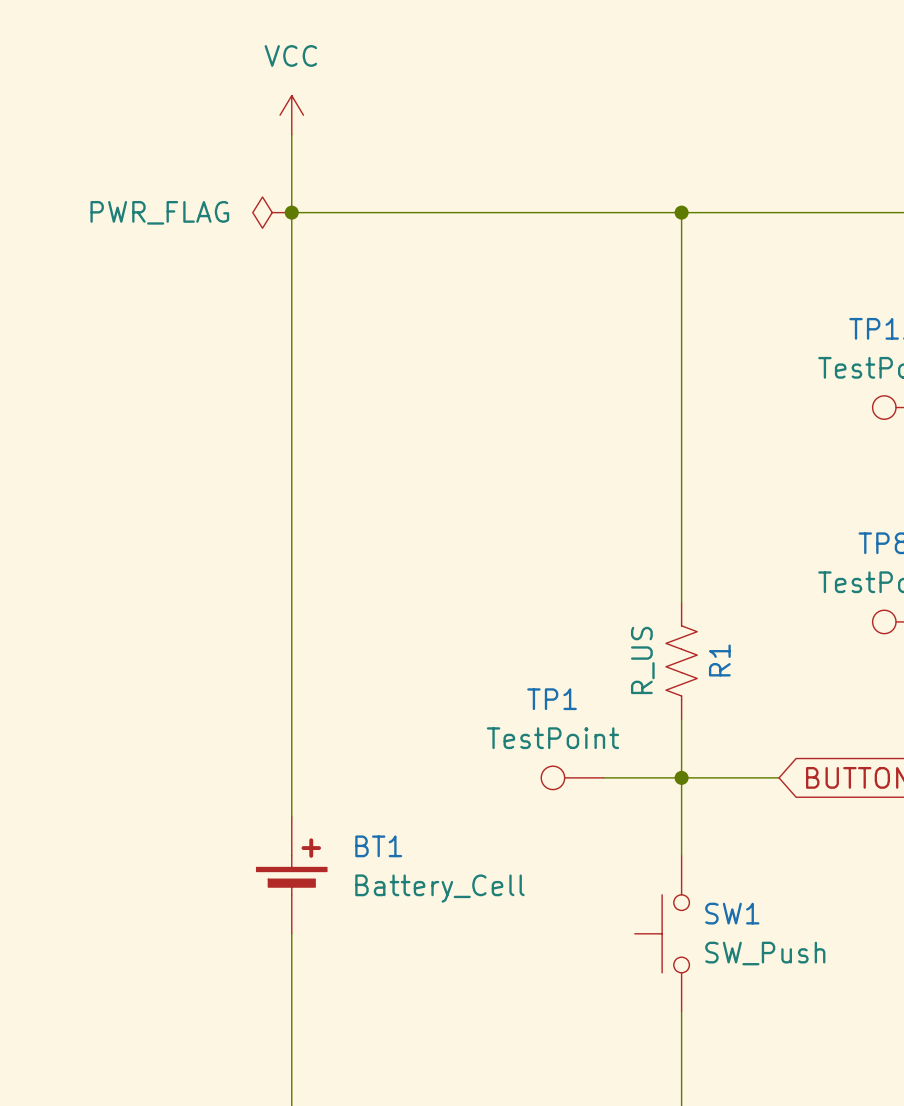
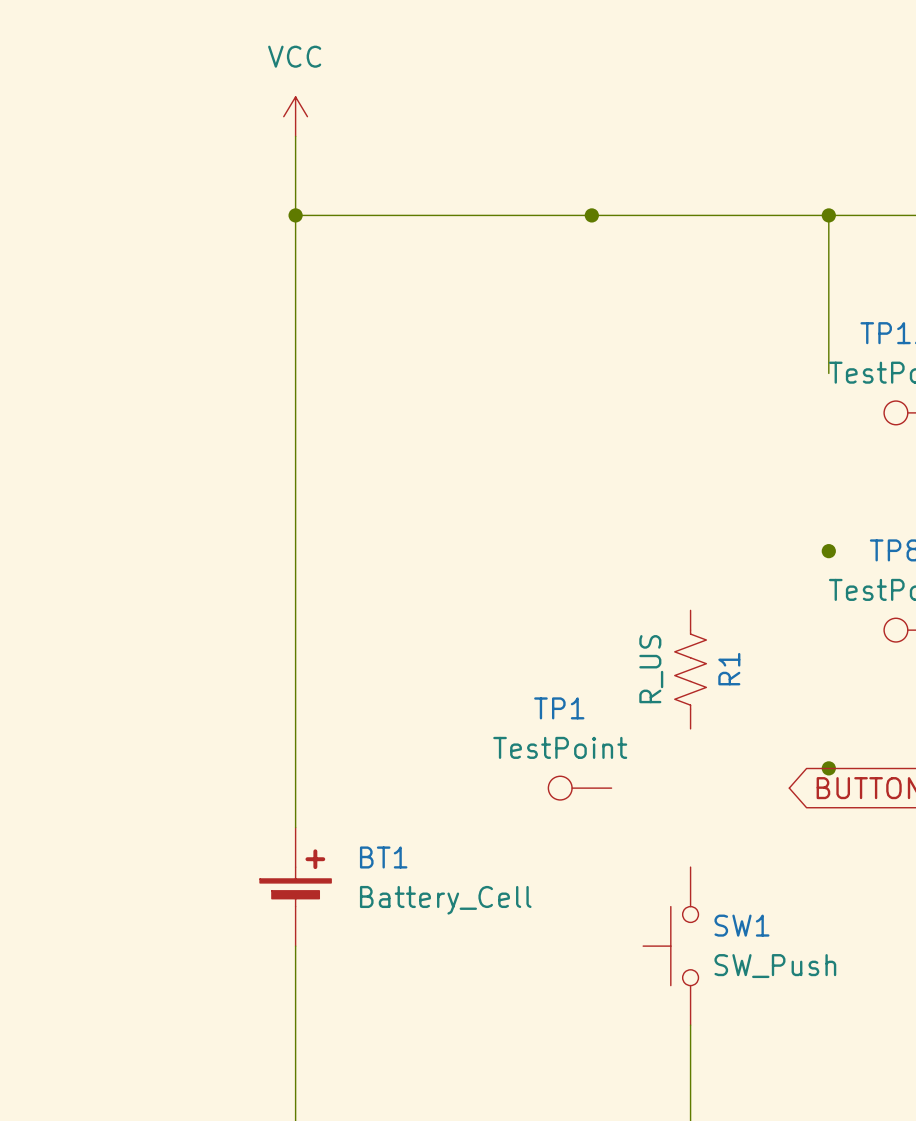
power symbol: PWR_FLAG (272, 212) -> none
junction: none -> (591, 215)
wire: (681, 212) (681, 602) -> none
junction: (681, 212) -> none
wire: none -> (828, 215) (828, 373)
junction: none -> (828, 215)
junction: none -> (828, 551)
wire: (681, 719) (681, 855) -> none
junction: none -> (828, 768)
wire: (603, 777) (779, 777) -> none
junction: (681, 777) -> none

